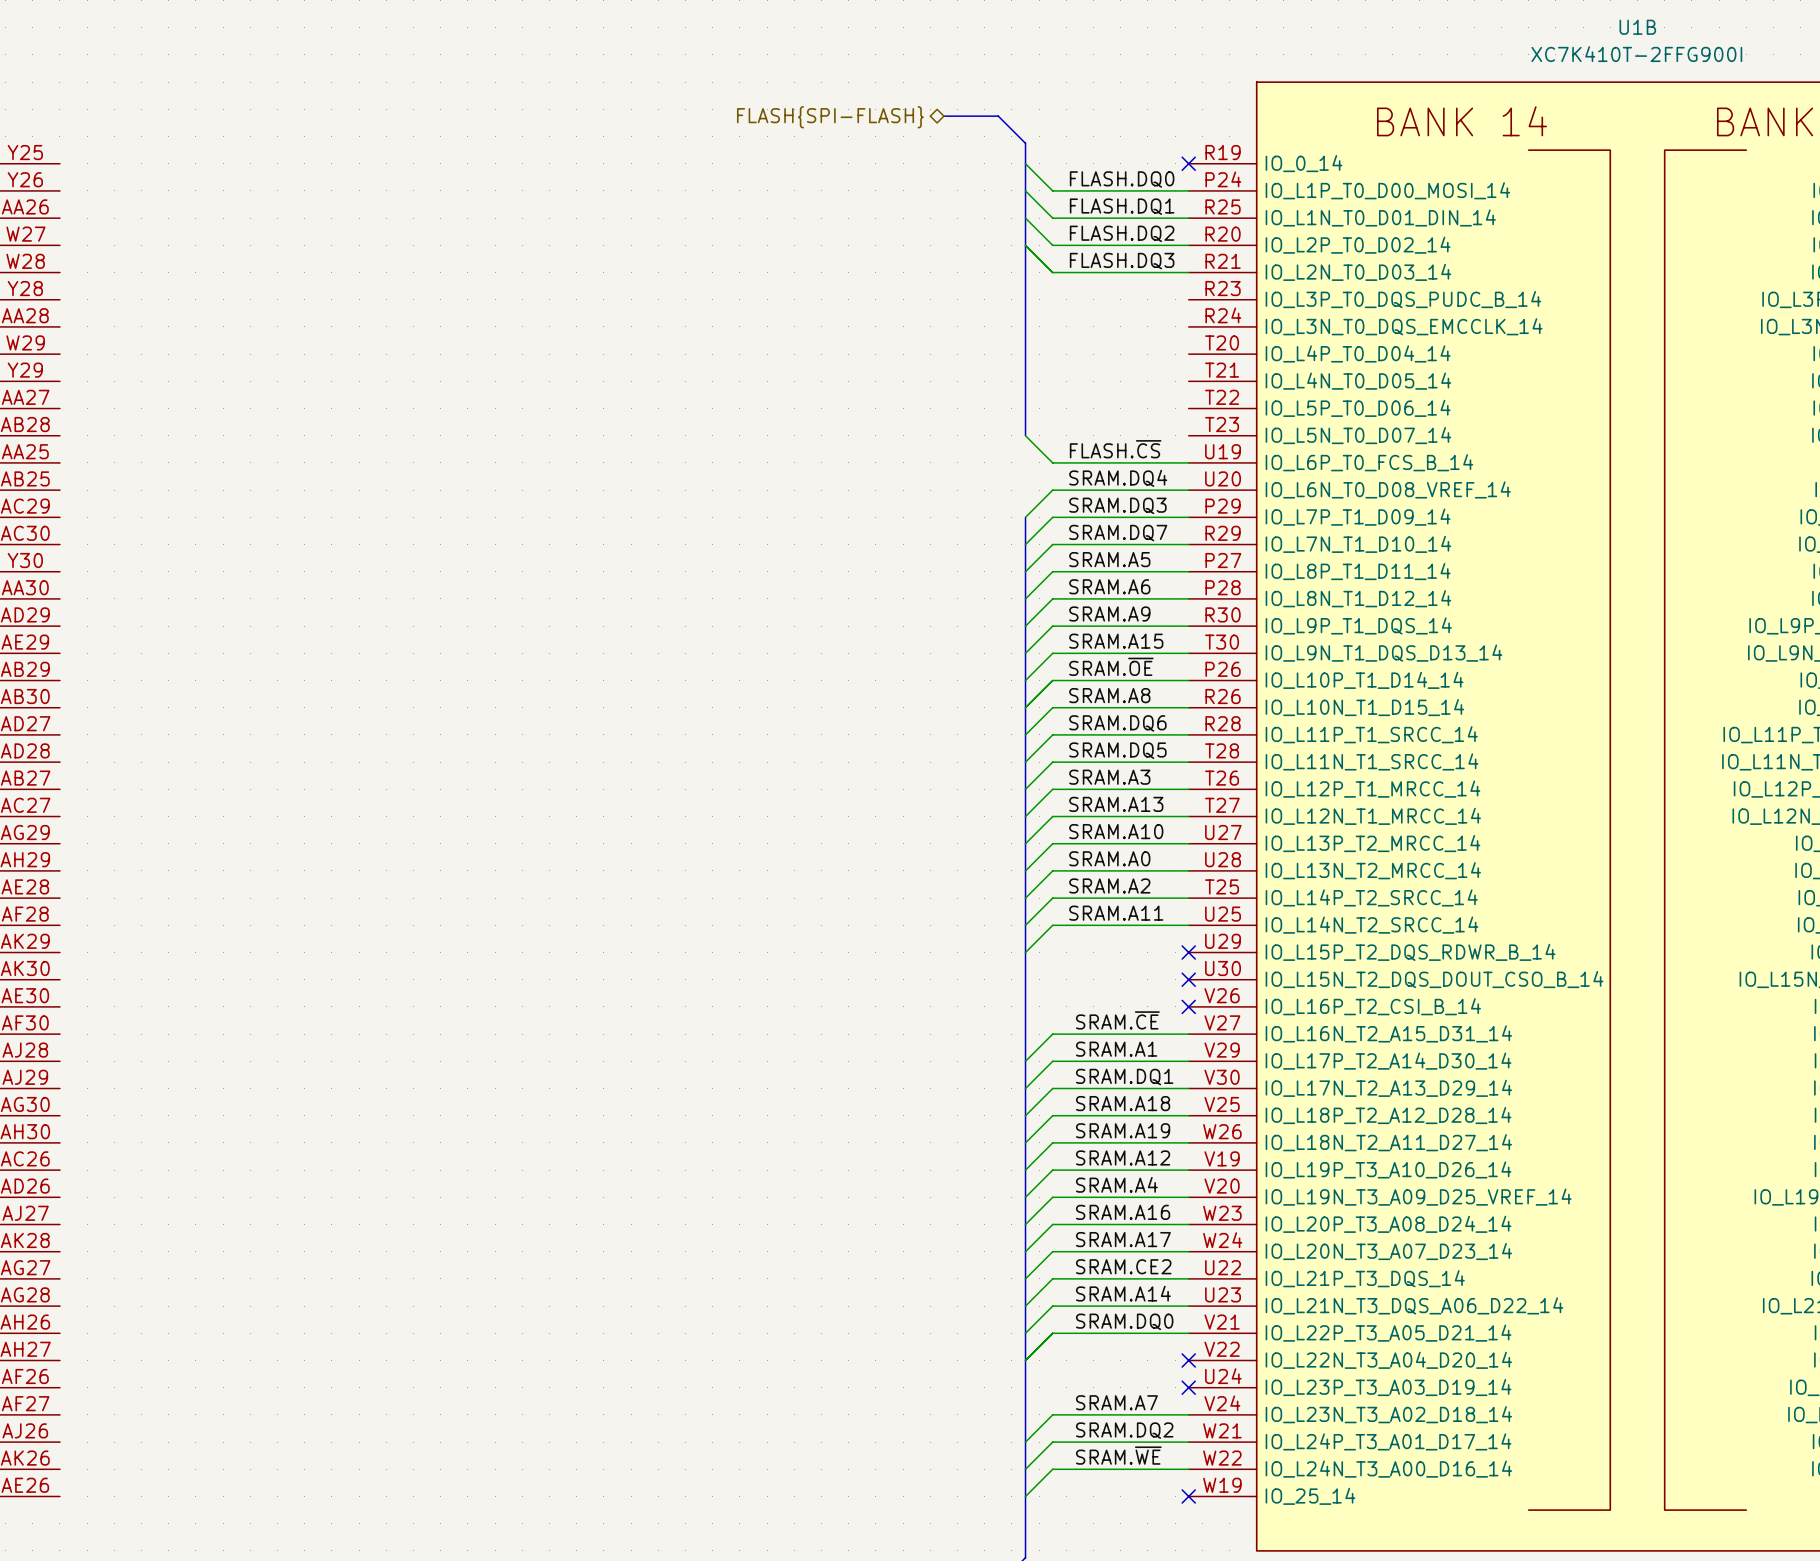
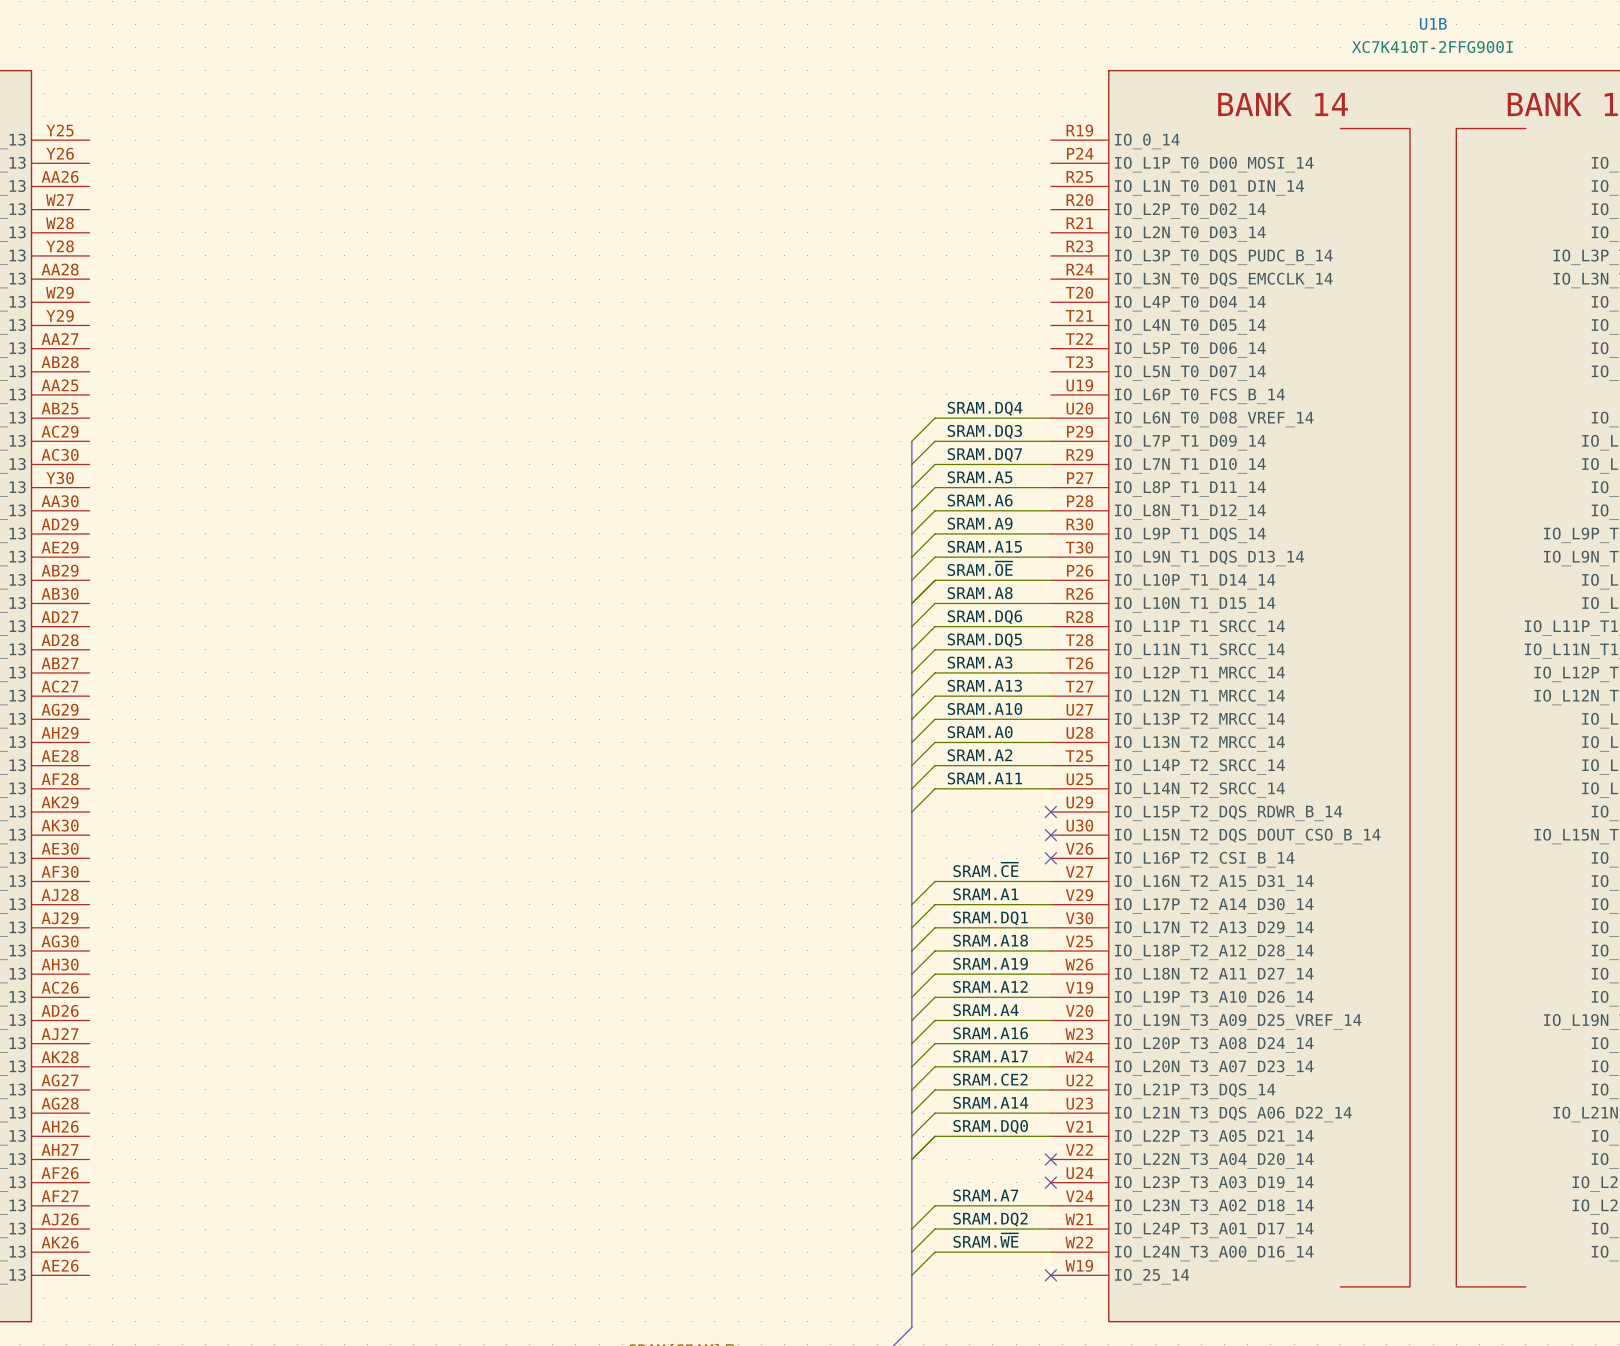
bus: (943, 116) (998, 116) (1025, 143) (1025, 435) -> none
hierarchical label: FLASH{SPI-FLASH} (830, 117) -> none
wire: (1025, 163) (1052, 190) (1188, 190) -> none
no-connect mark: (1188, 163) -> none
label: FLASH.DQ0 (1122, 179) -> none
wire: (1025, 190) (1052, 218) (1188, 218) -> none
label: FLASH.DQ1 (1122, 206) -> none
wire: (1025, 218) (1052, 245) (1188, 245) -> none
label: FLASH.DQ2 (1122, 233) -> none
wire: (1025, 245) (1052, 272) (1188, 272) -> none
label: FLASH.DQ3 (1122, 261) -> none
wire: (1025, 435) (1052, 462) (1188, 462) -> none
label: FLASH.~{CS} (1115, 449) -> none

